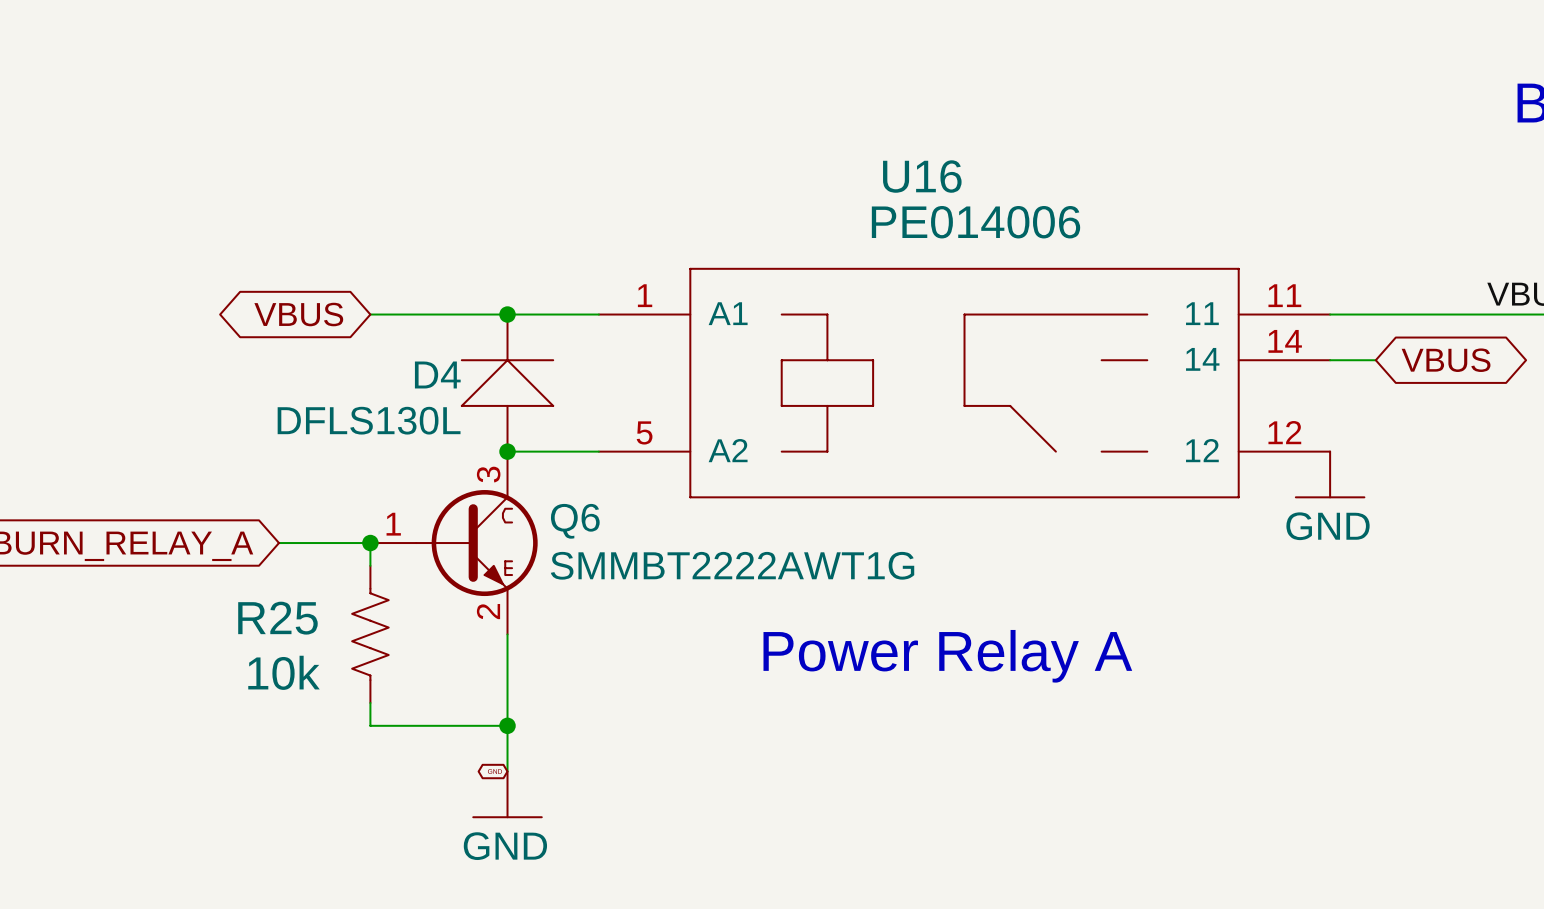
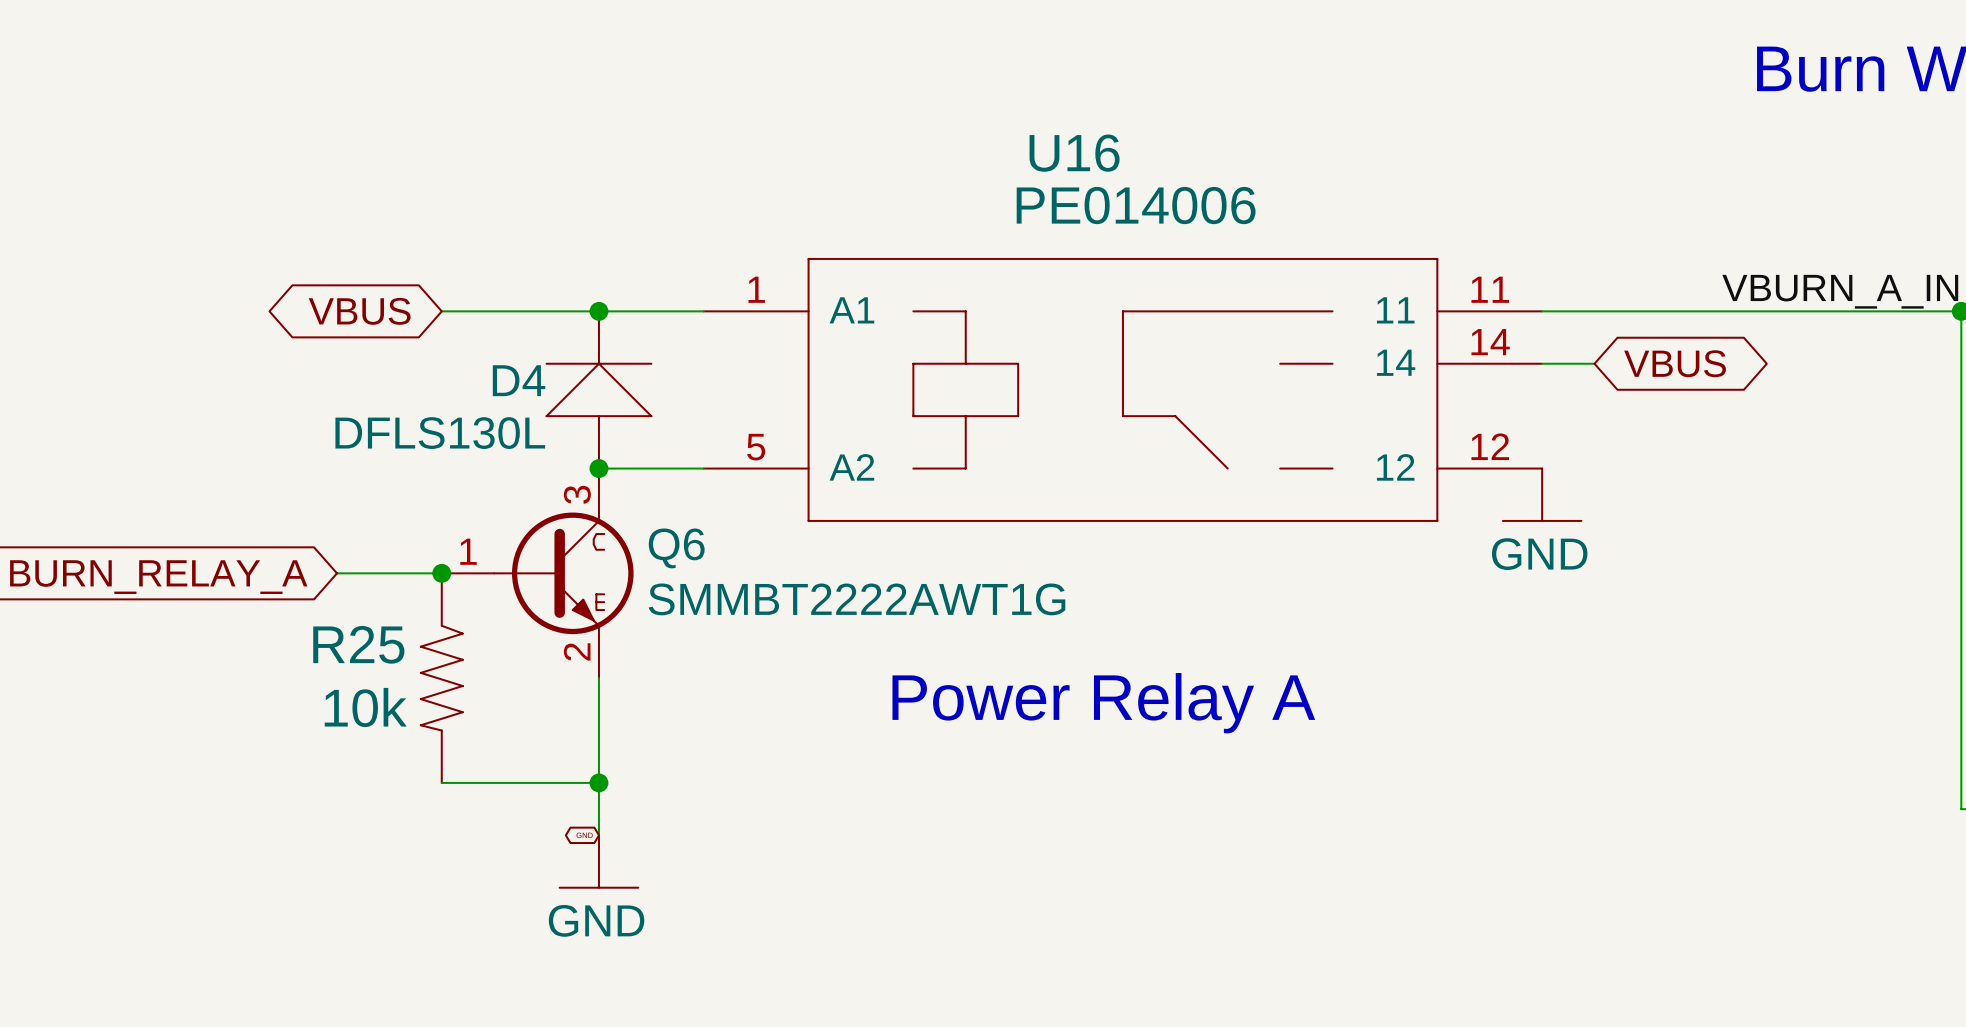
R25 symbol: [352, 565, 389, 703] -> [420, 573, 463, 783]

